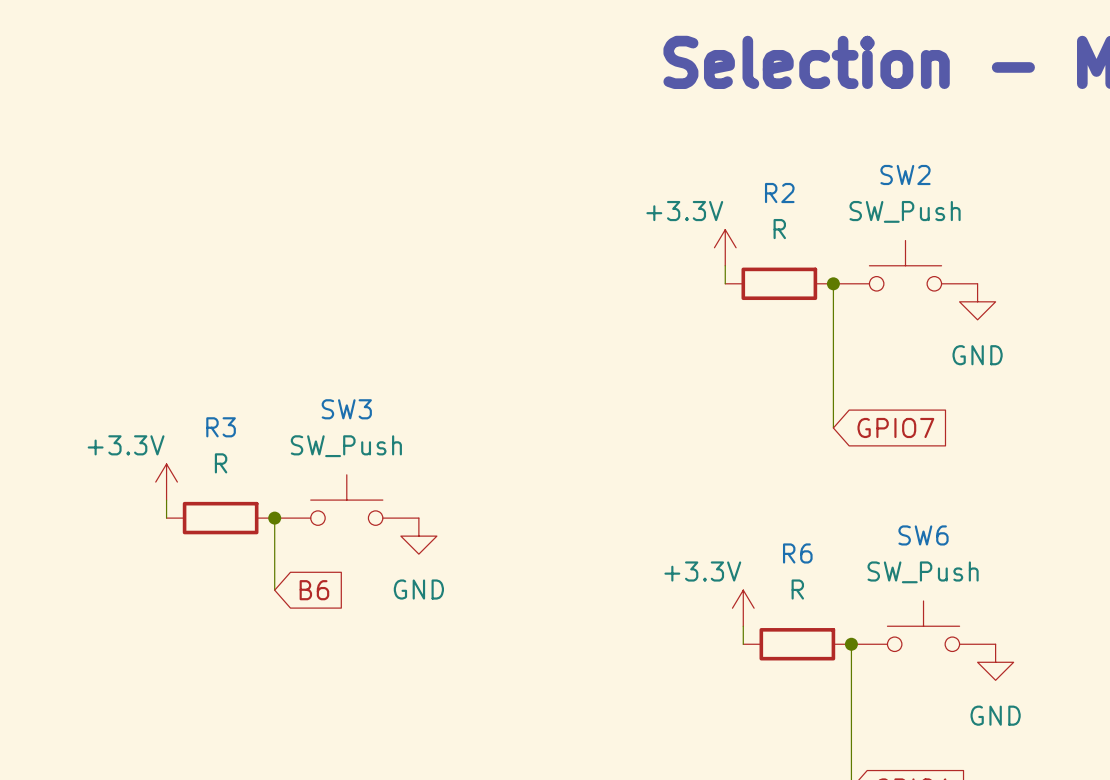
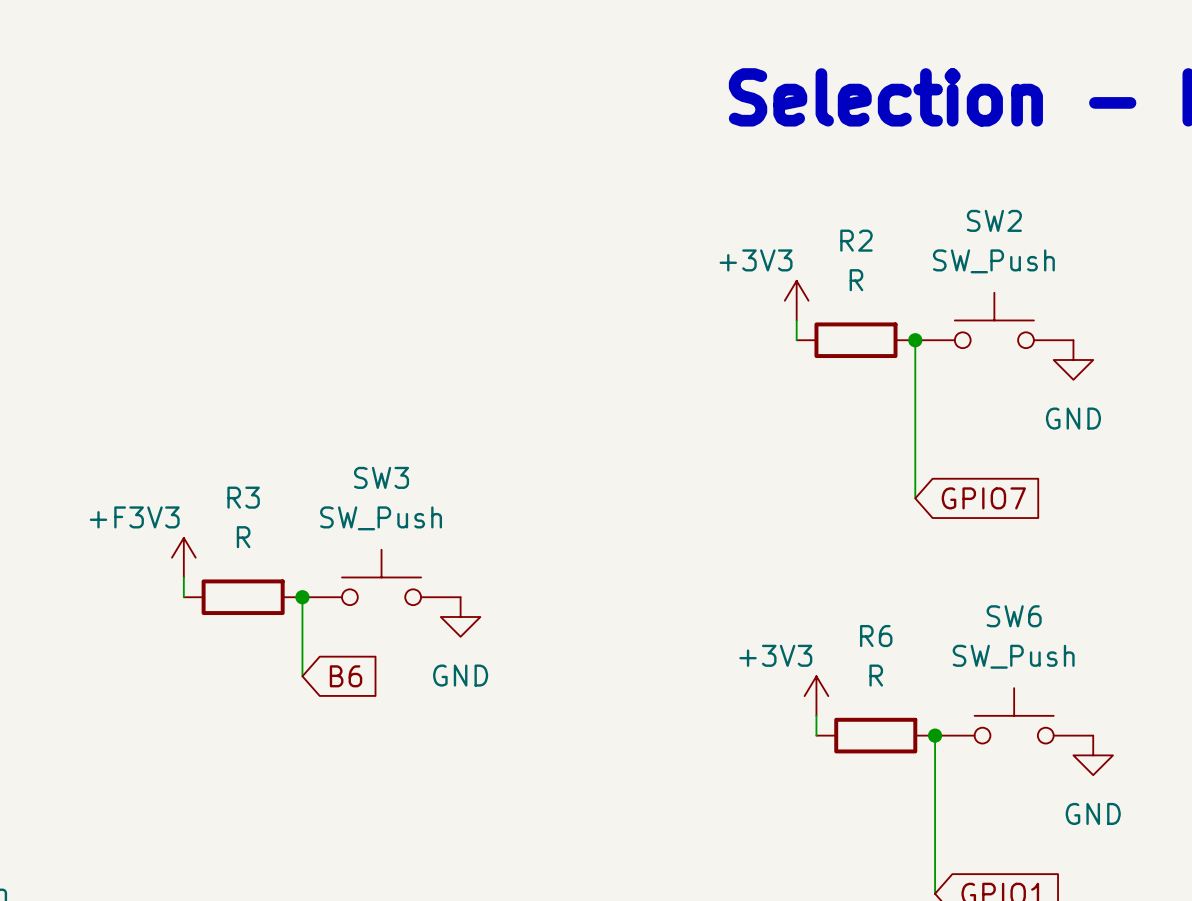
power symbol: +3.3V (725, 247) -> +3V3 (796, 300)
power symbol: +3.3V (166, 482) -> +F3V3 (183, 557)
power symbol: +3.3V (743, 608) -> +3V3 (816, 696)

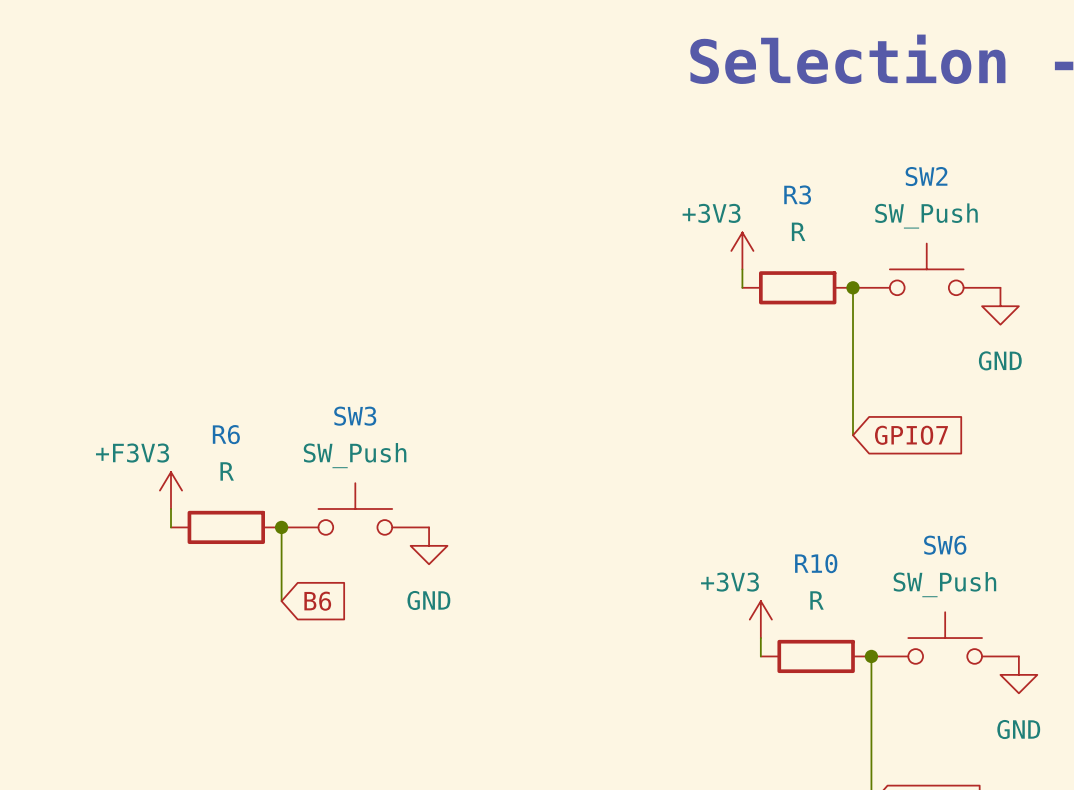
R2 name: R2 (856, 240) -> R3 (797, 194)
R3 name: R3 (243, 497) -> R6 (226, 434)
R6 name: R6 (876, 636) -> R10 (816, 563)

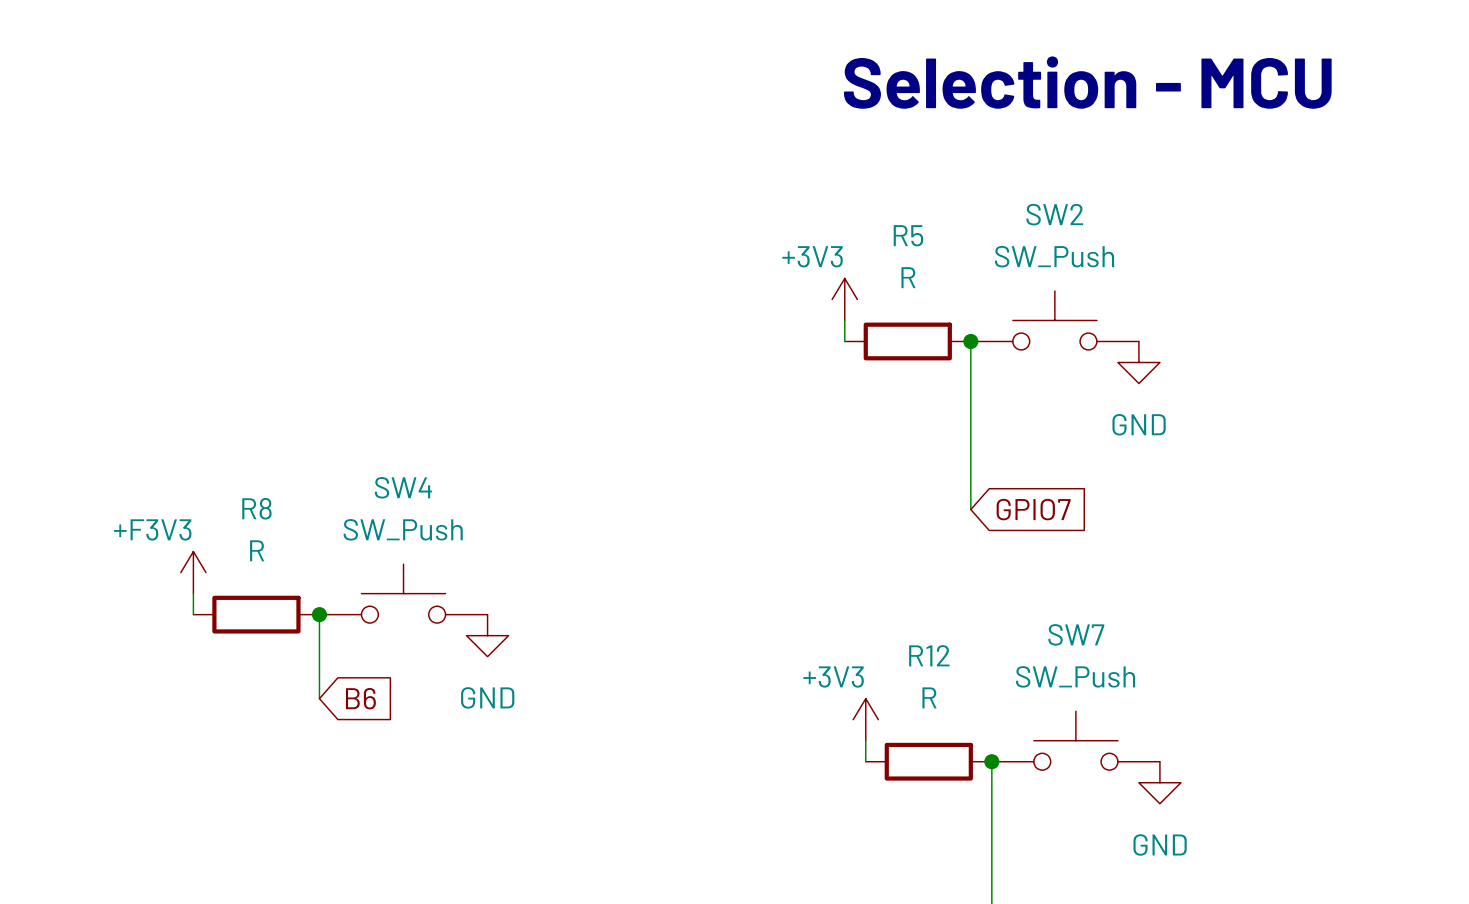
R3 name: R3 (797, 194) -> R5 (908, 235)
SW3 name: SW3 (355, 416) -> SW4 (403, 487)
R6 name: R6 (226, 434) -> R8 (256, 508)
SW6 name: SW6 (945, 545) -> SW7 (1076, 634)
R10 name: R10 (816, 563) -> R12 (929, 655)

